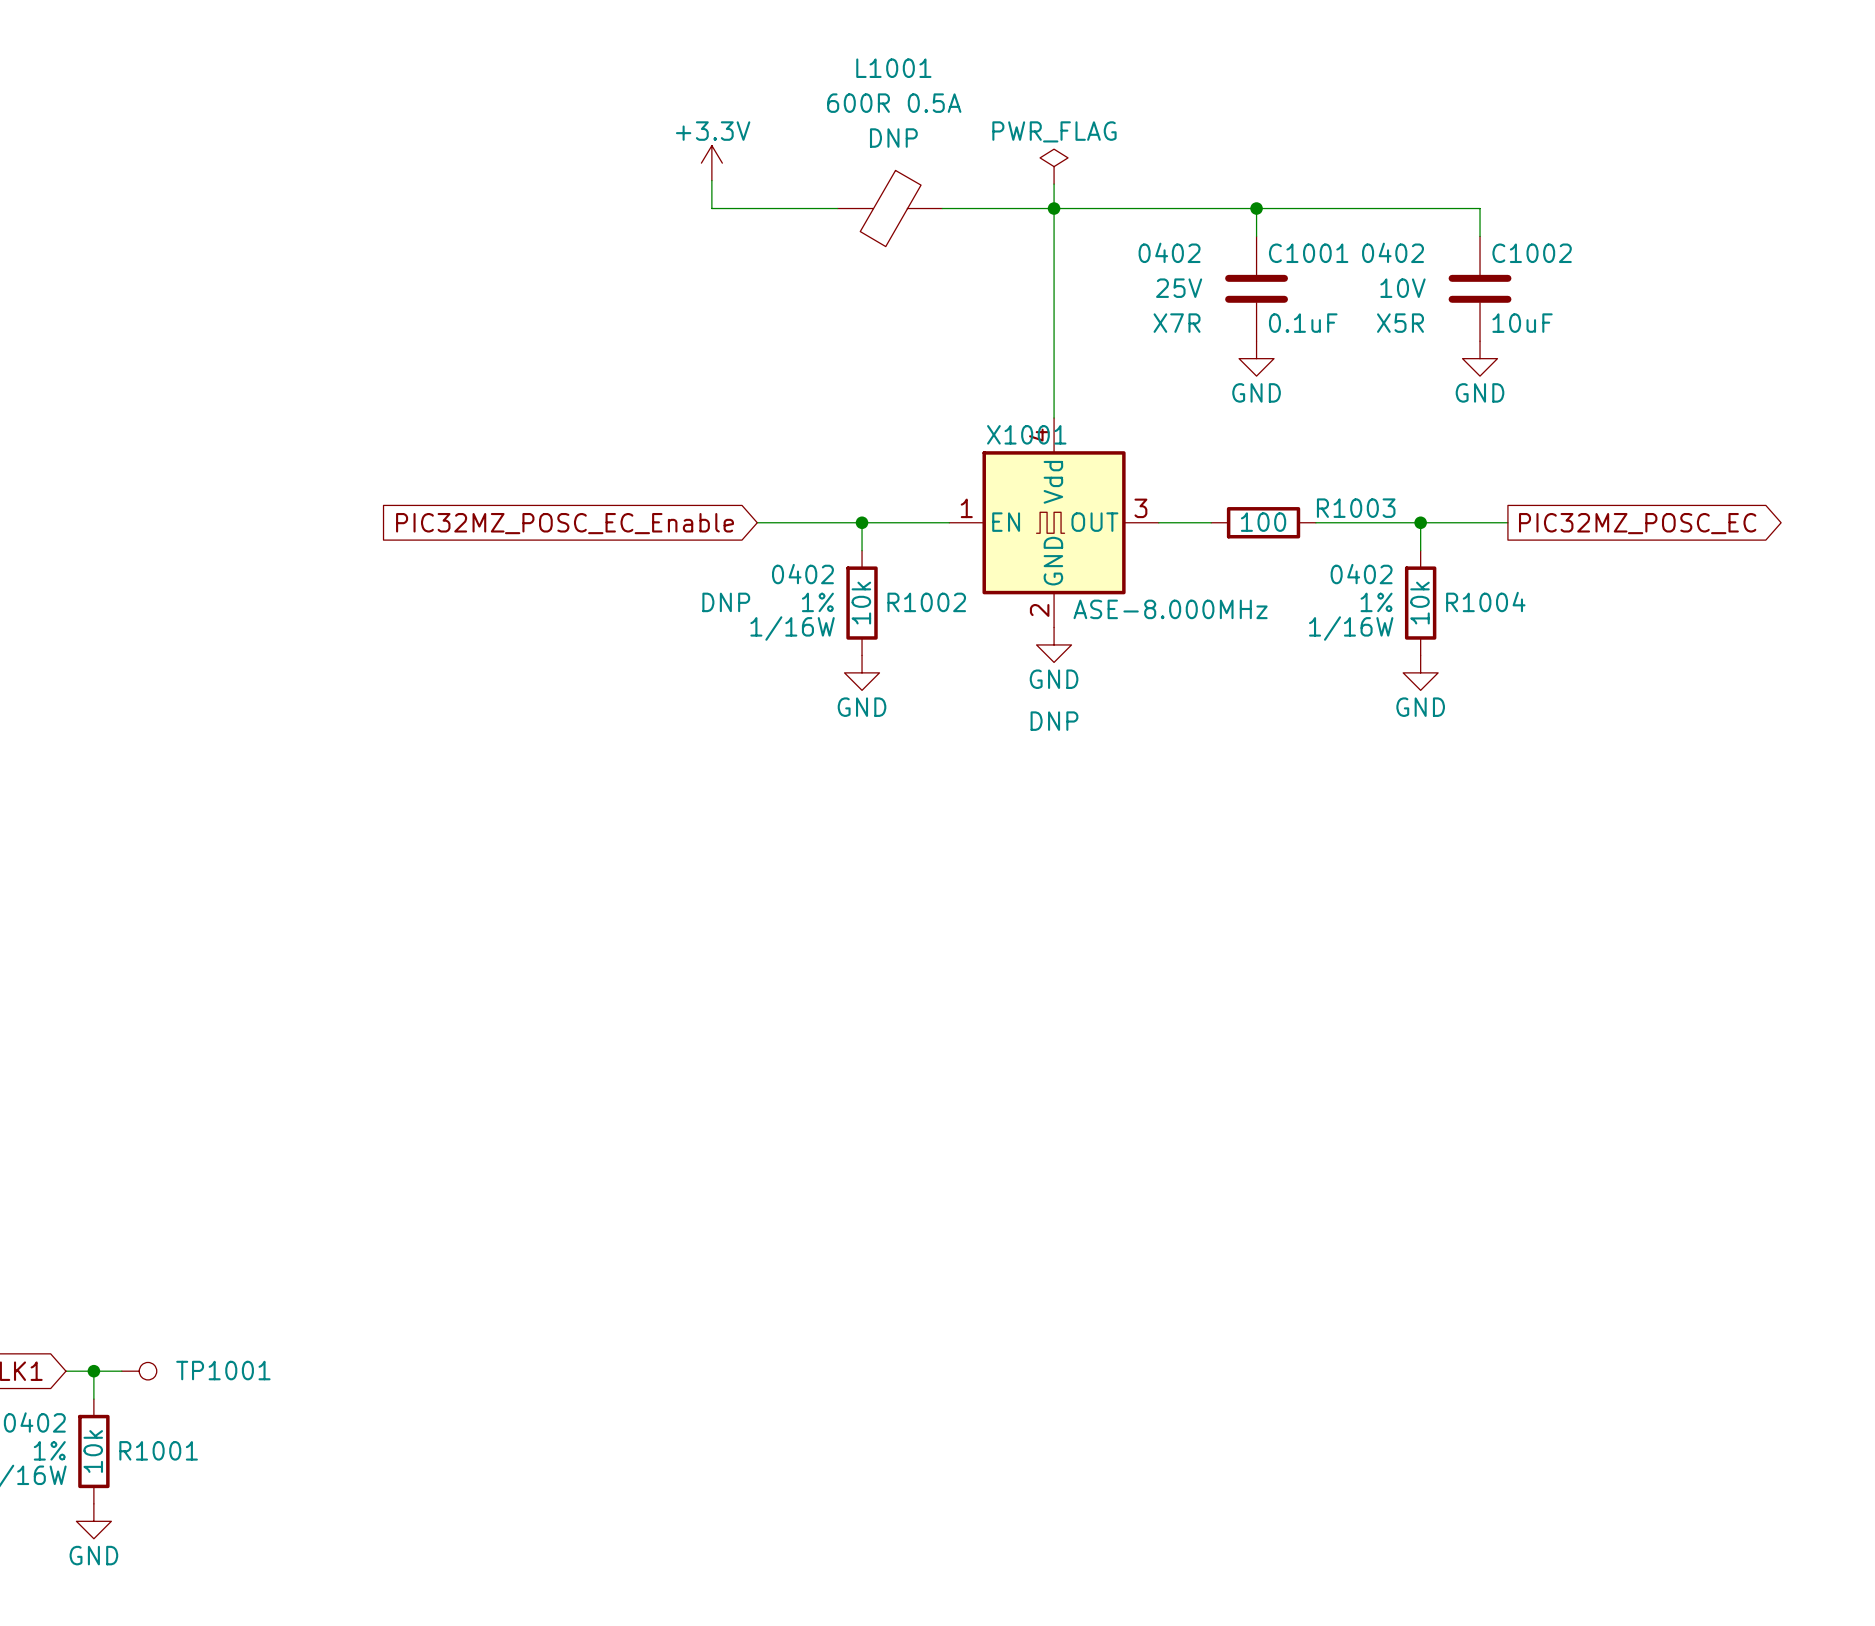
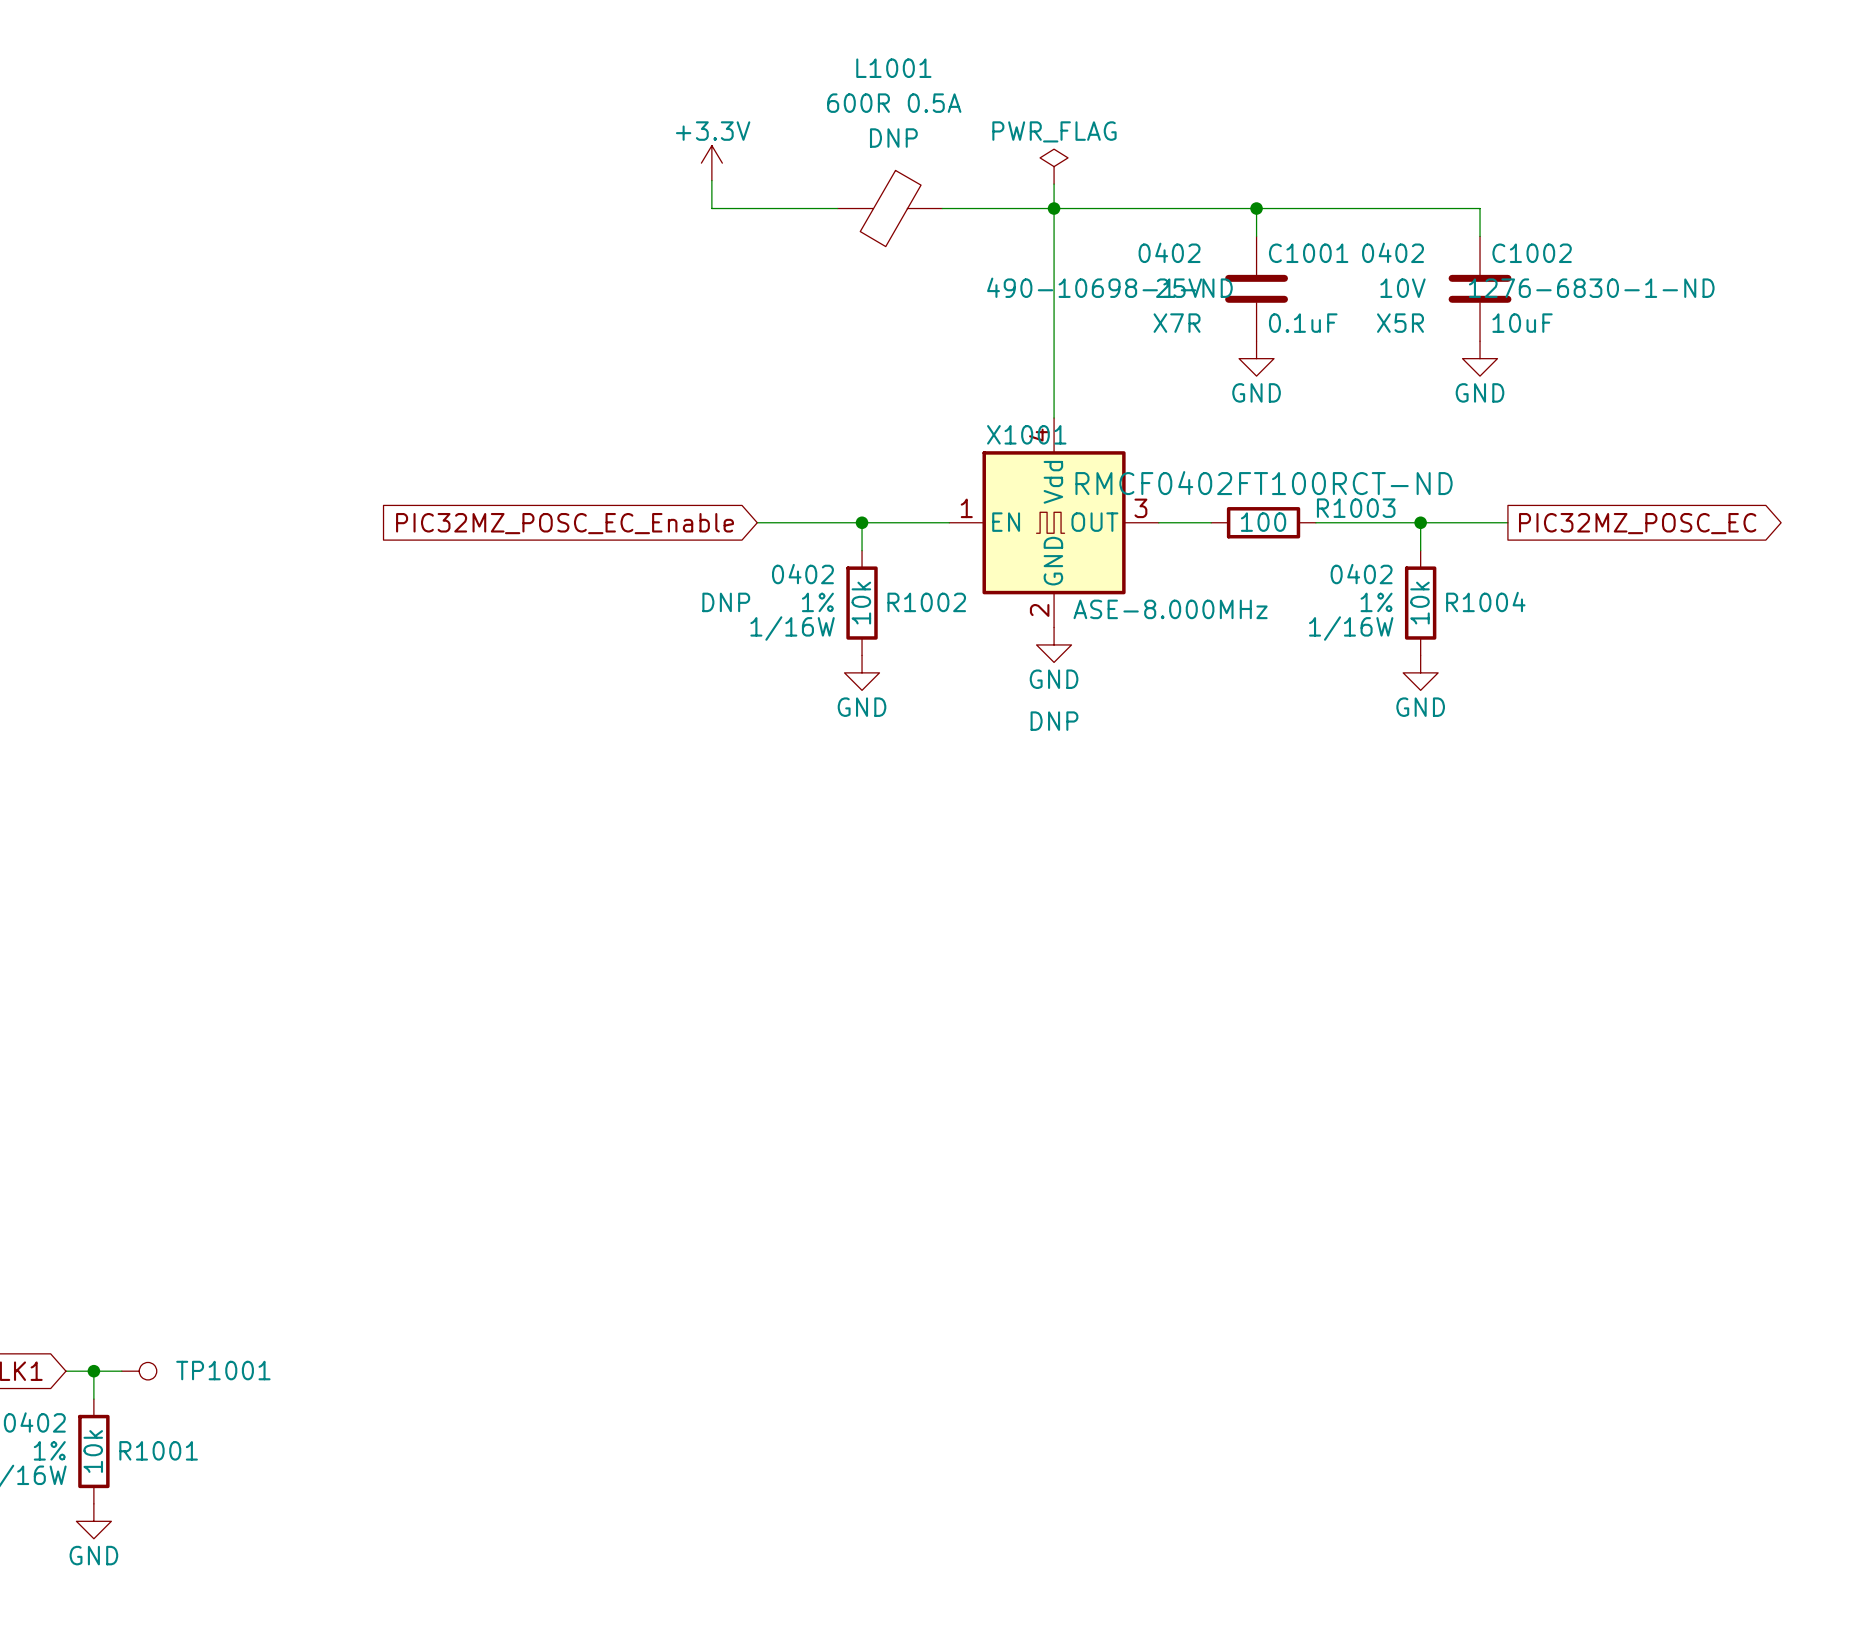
C1001 text: none -> 490-10698-1-ND (1109, 287)
C1002 text: none -> 1276-6830-1-ND (1591, 288)
R1003 text: none -> RMCF0402FT100RCT-ND (1264, 483)

